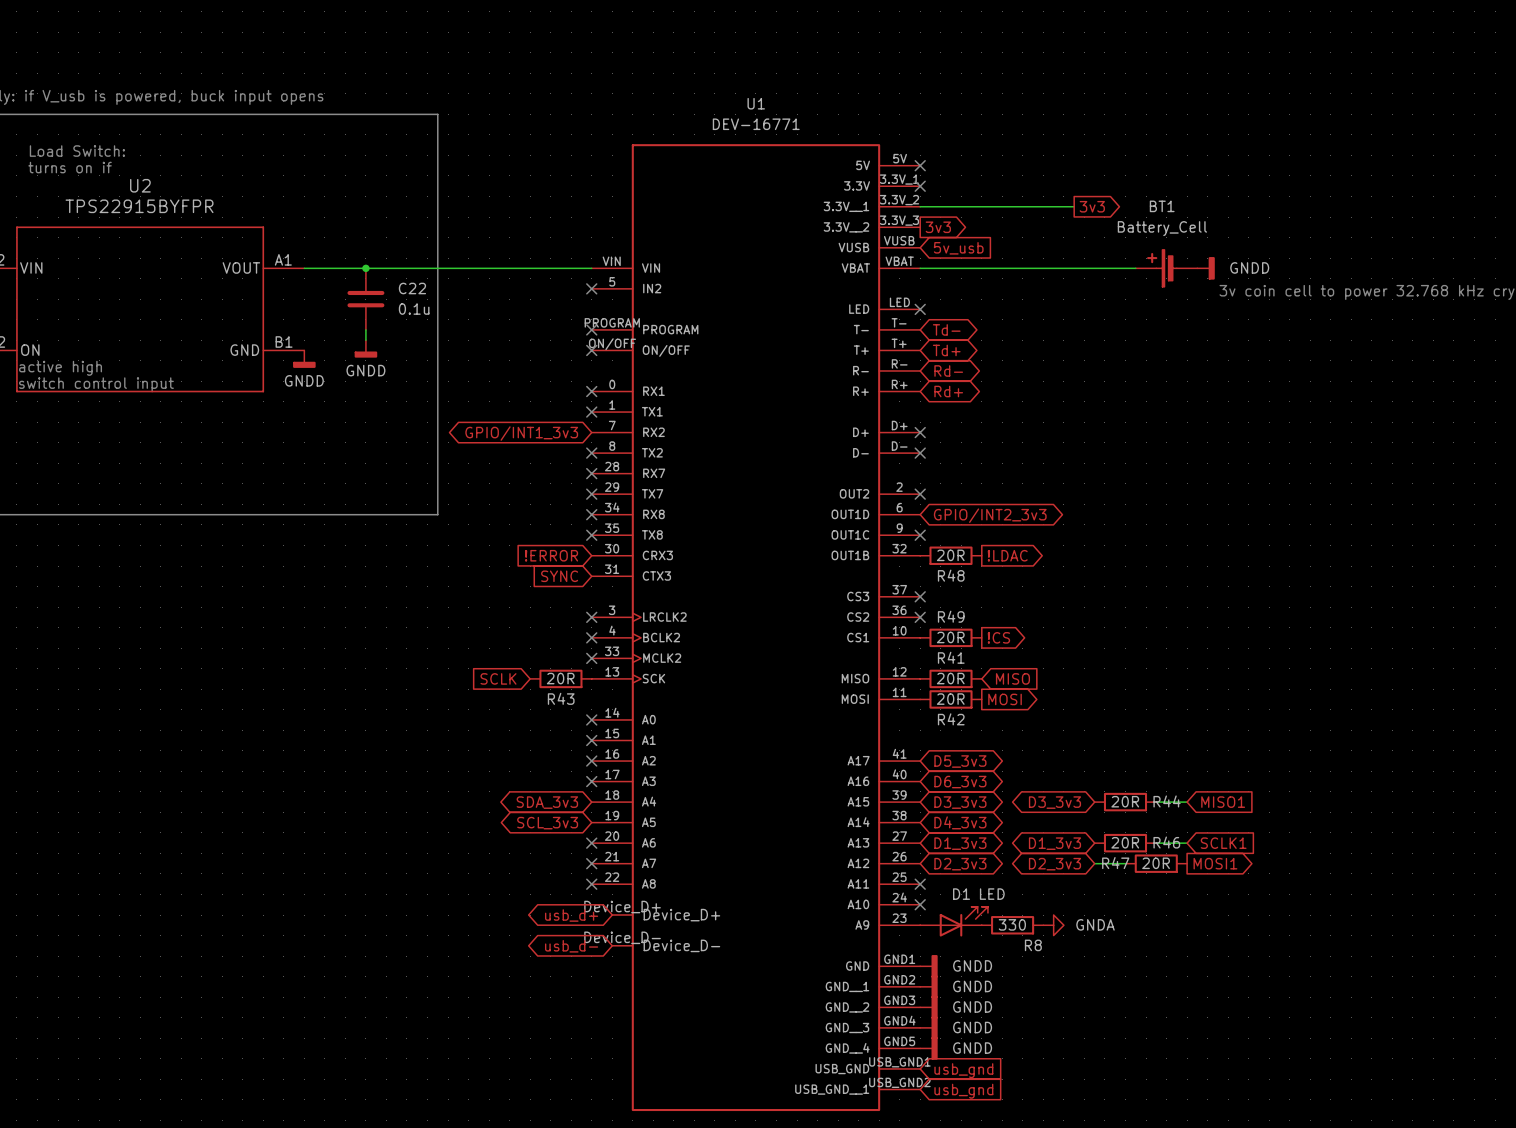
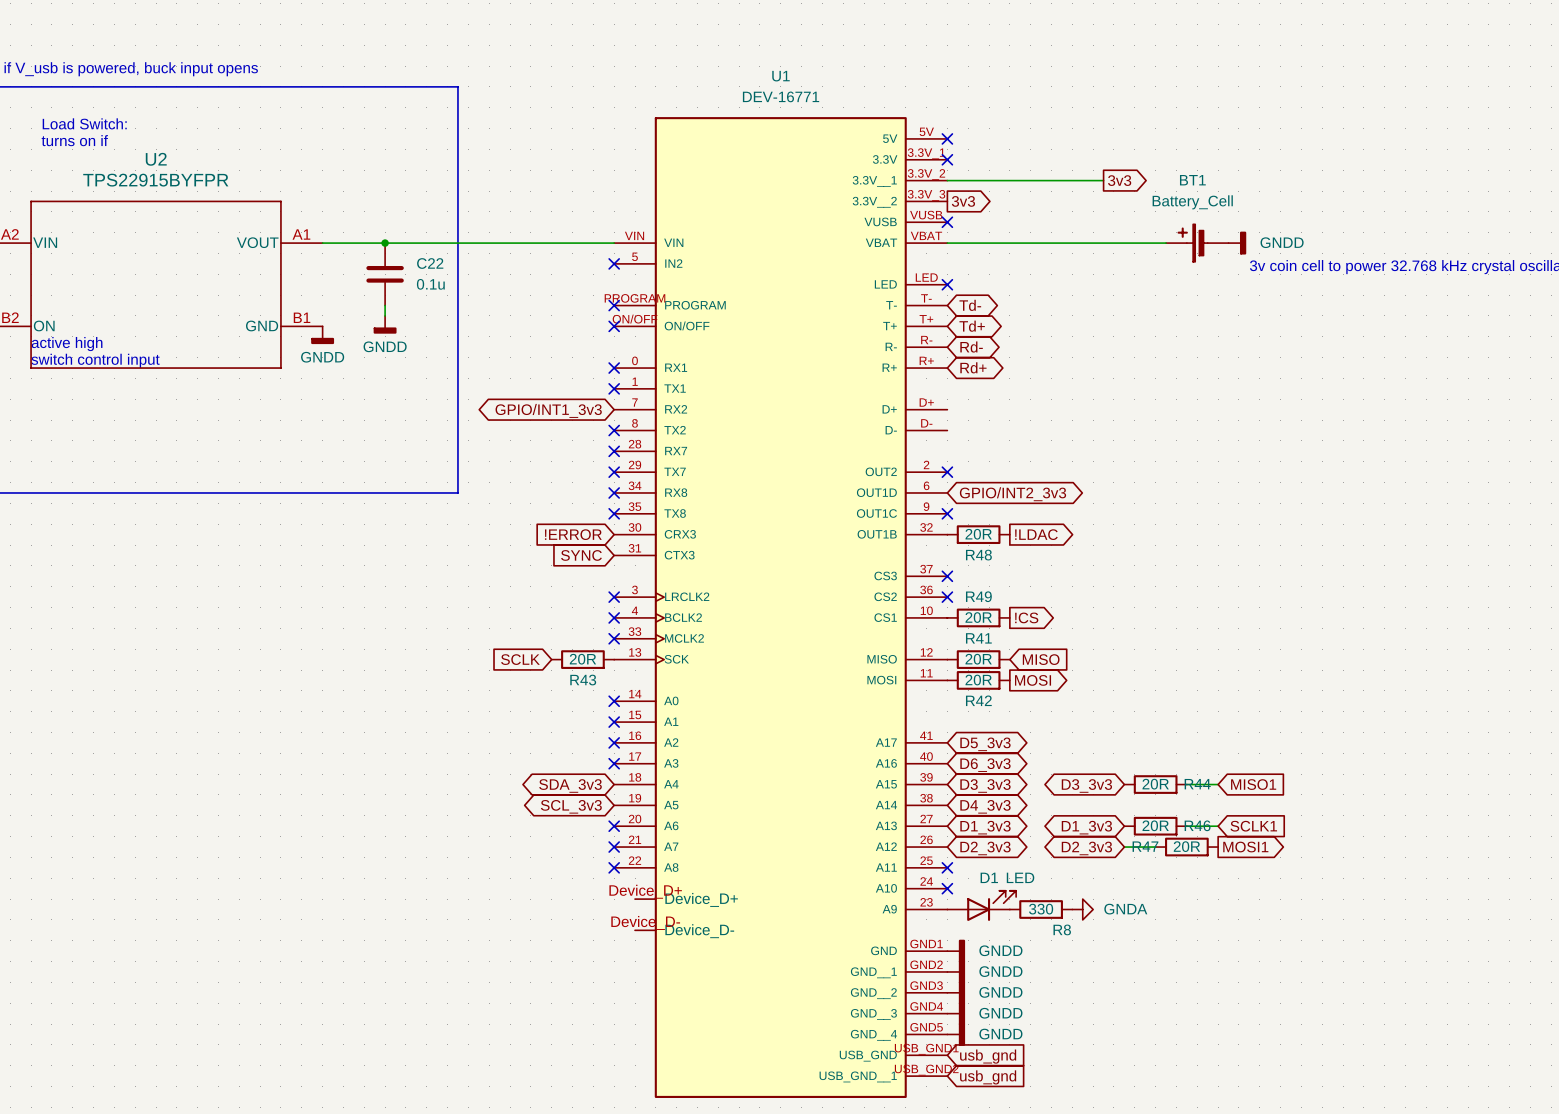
no-connect mark: none -> (947, 222)
global label: 5v_usb (958, 248) -> none
no-connect mark: (920, 432) -> none
no-connect mark: (920, 453) -> none
global label: usb_d+ (571, 915) -> none
global label: usb_d- (571, 946) -> none

